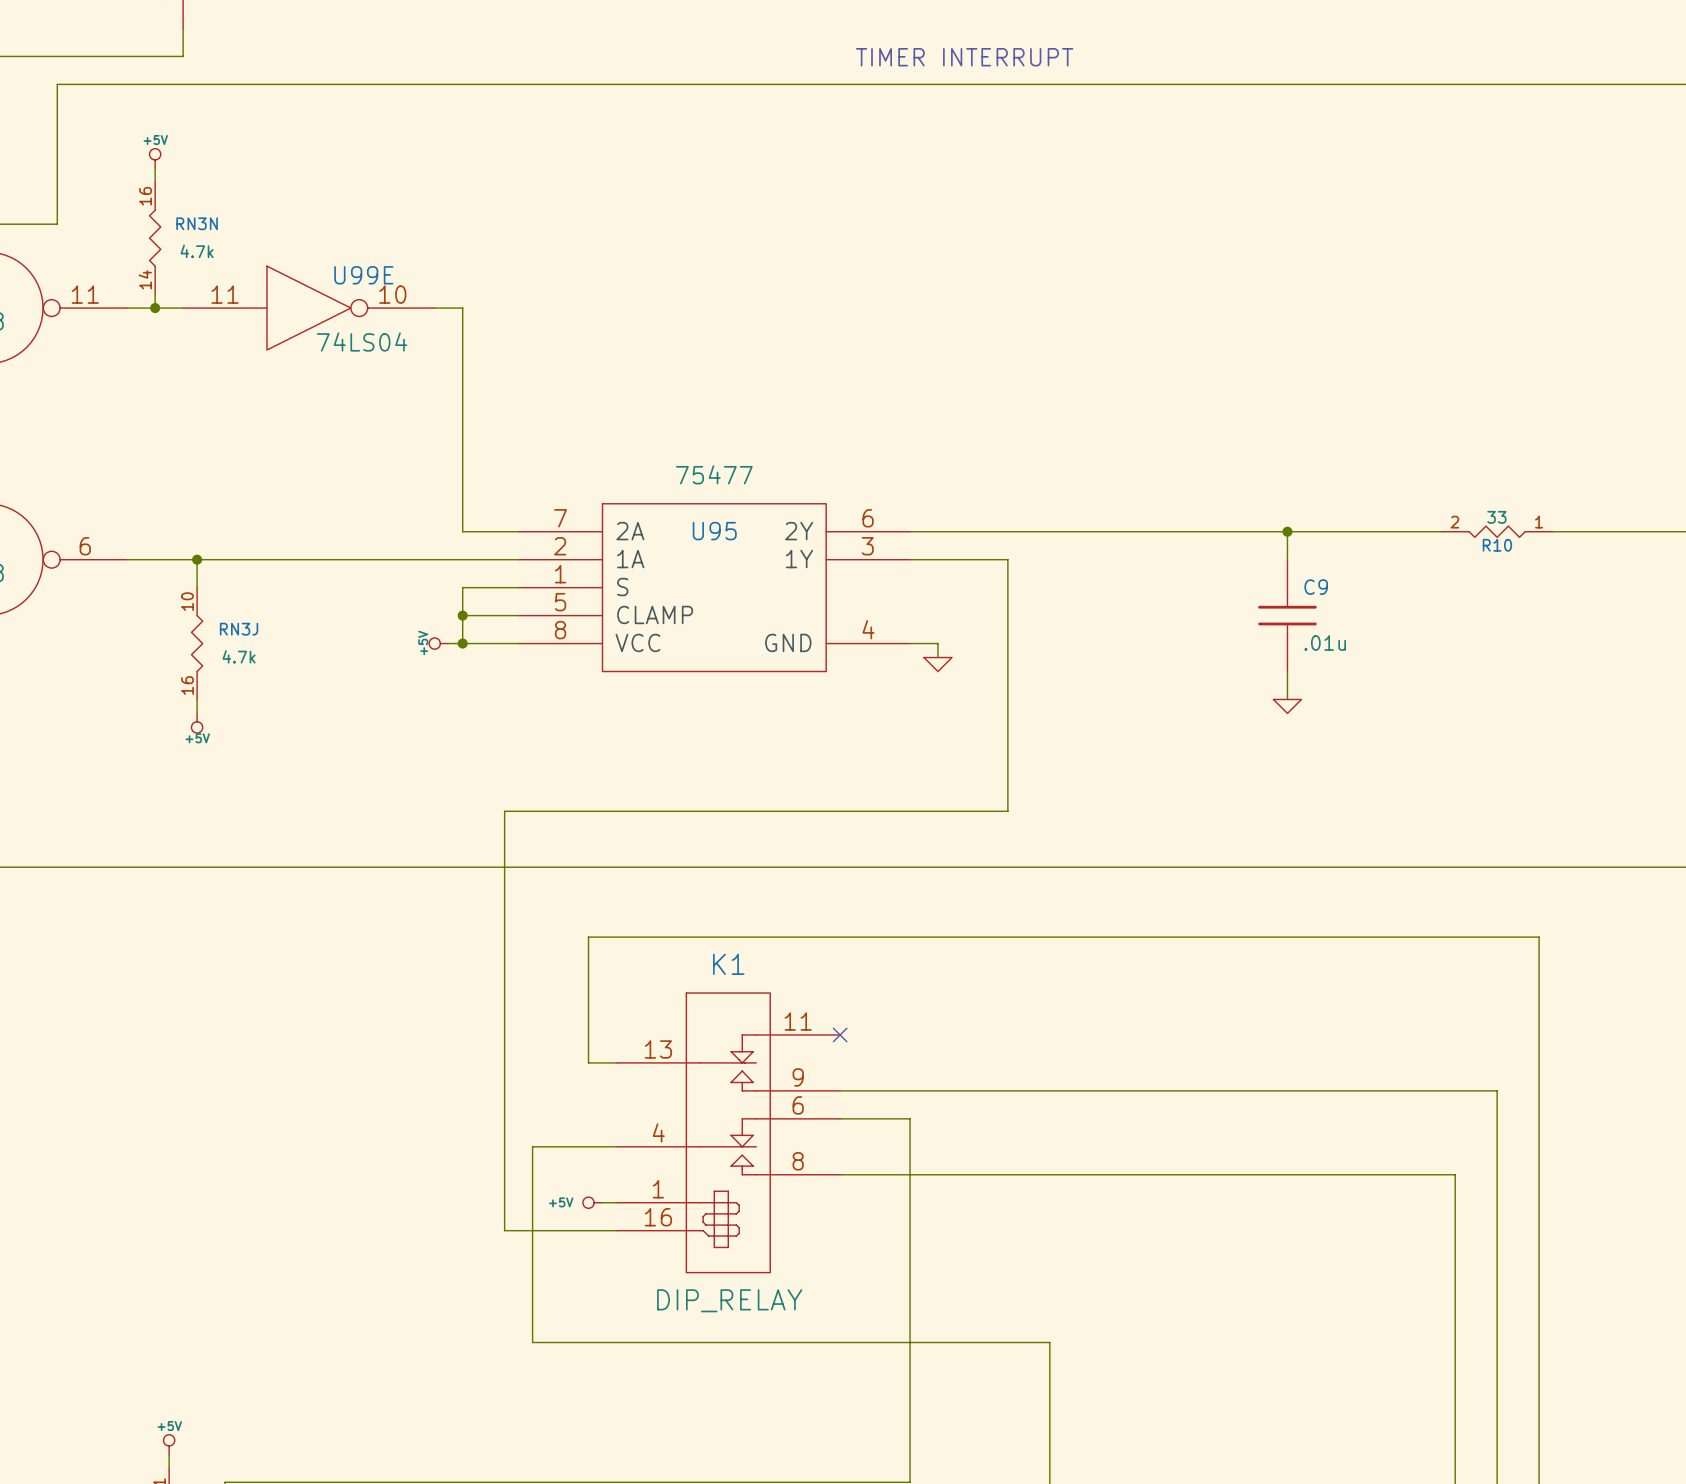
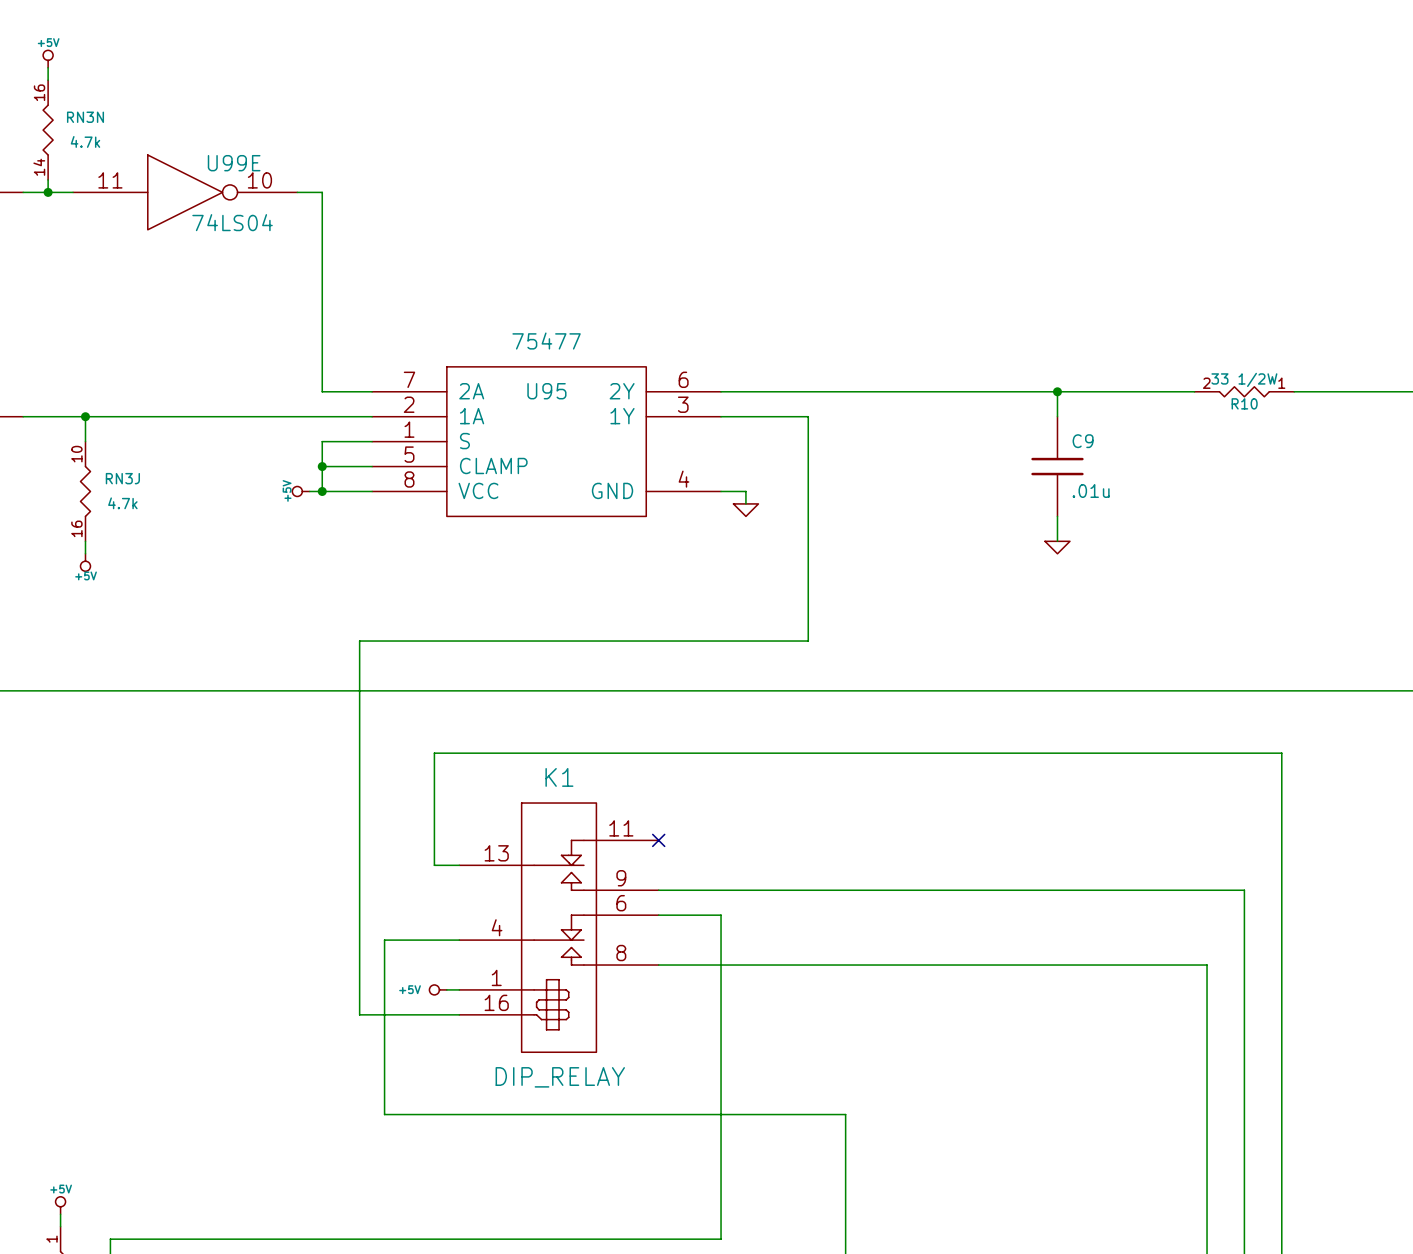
R10 value: 33 (1496, 517) -> 33 1/2W (1244, 379)

